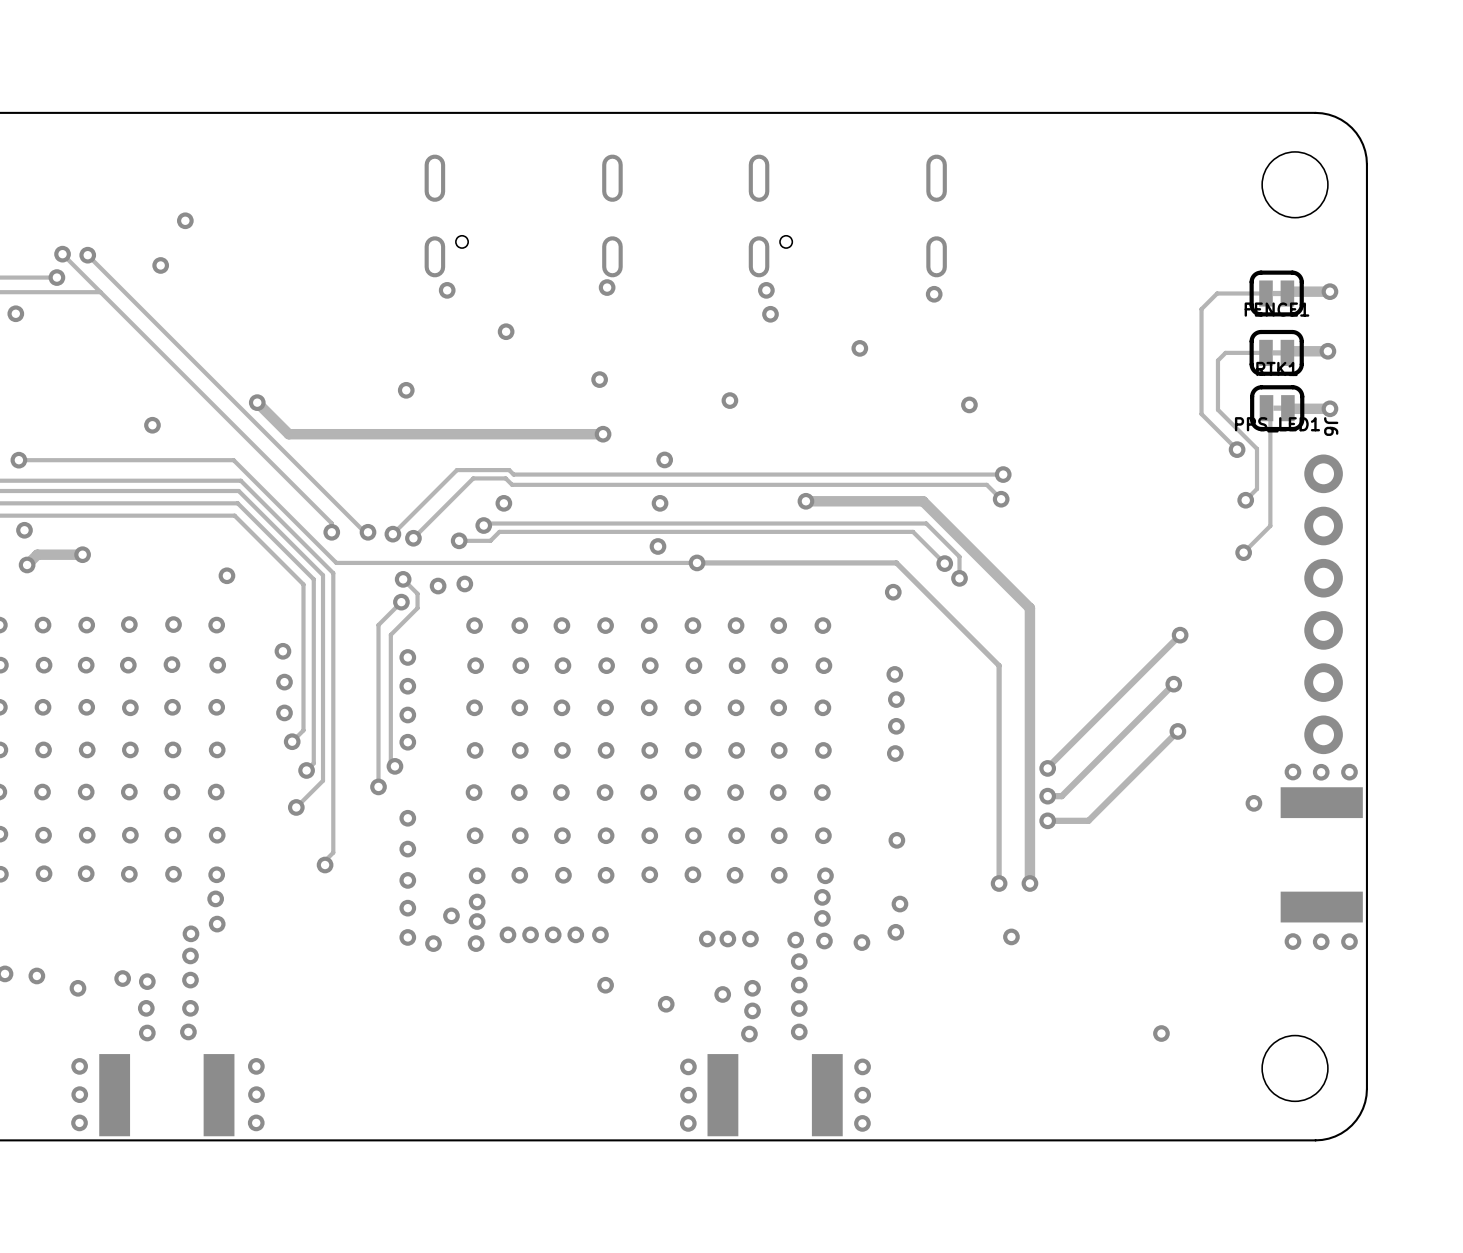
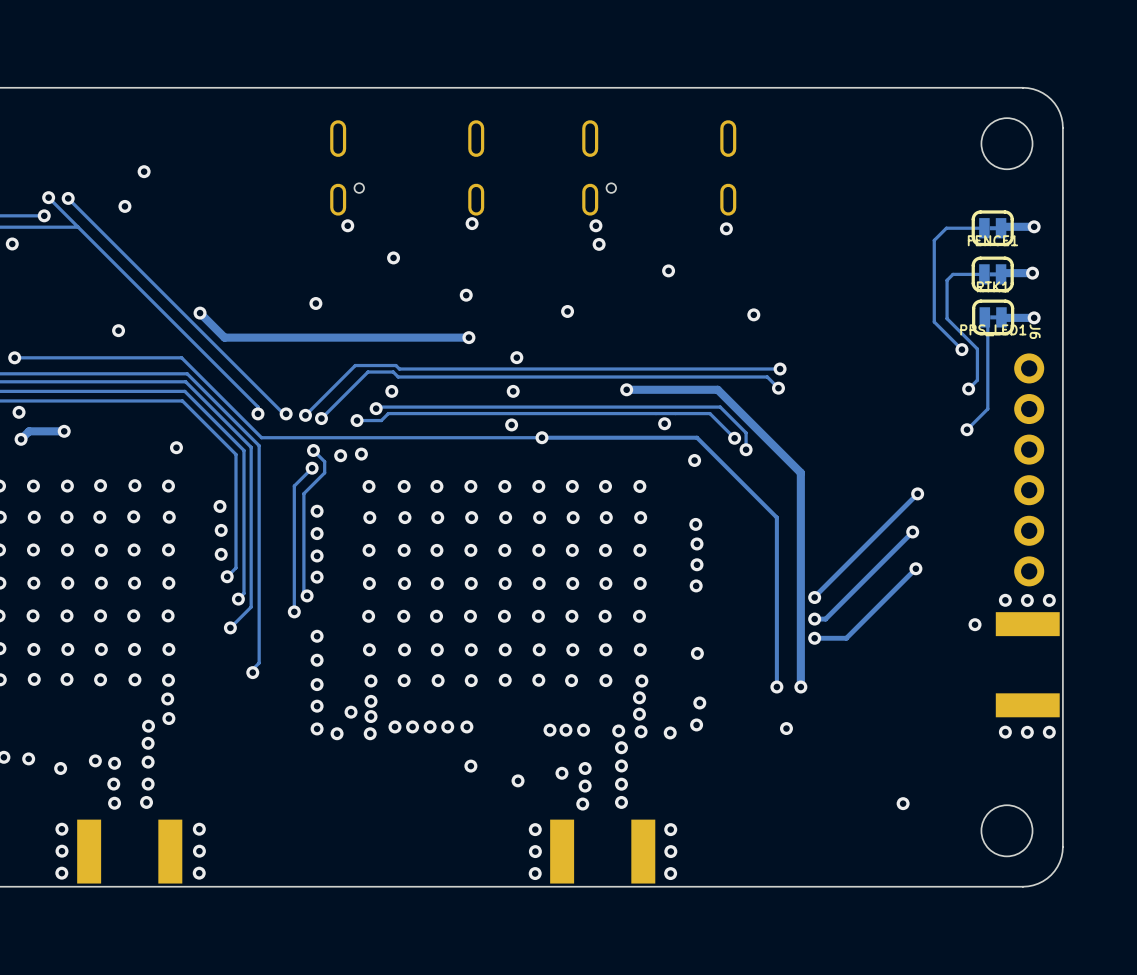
via: none -> (664, 423)

